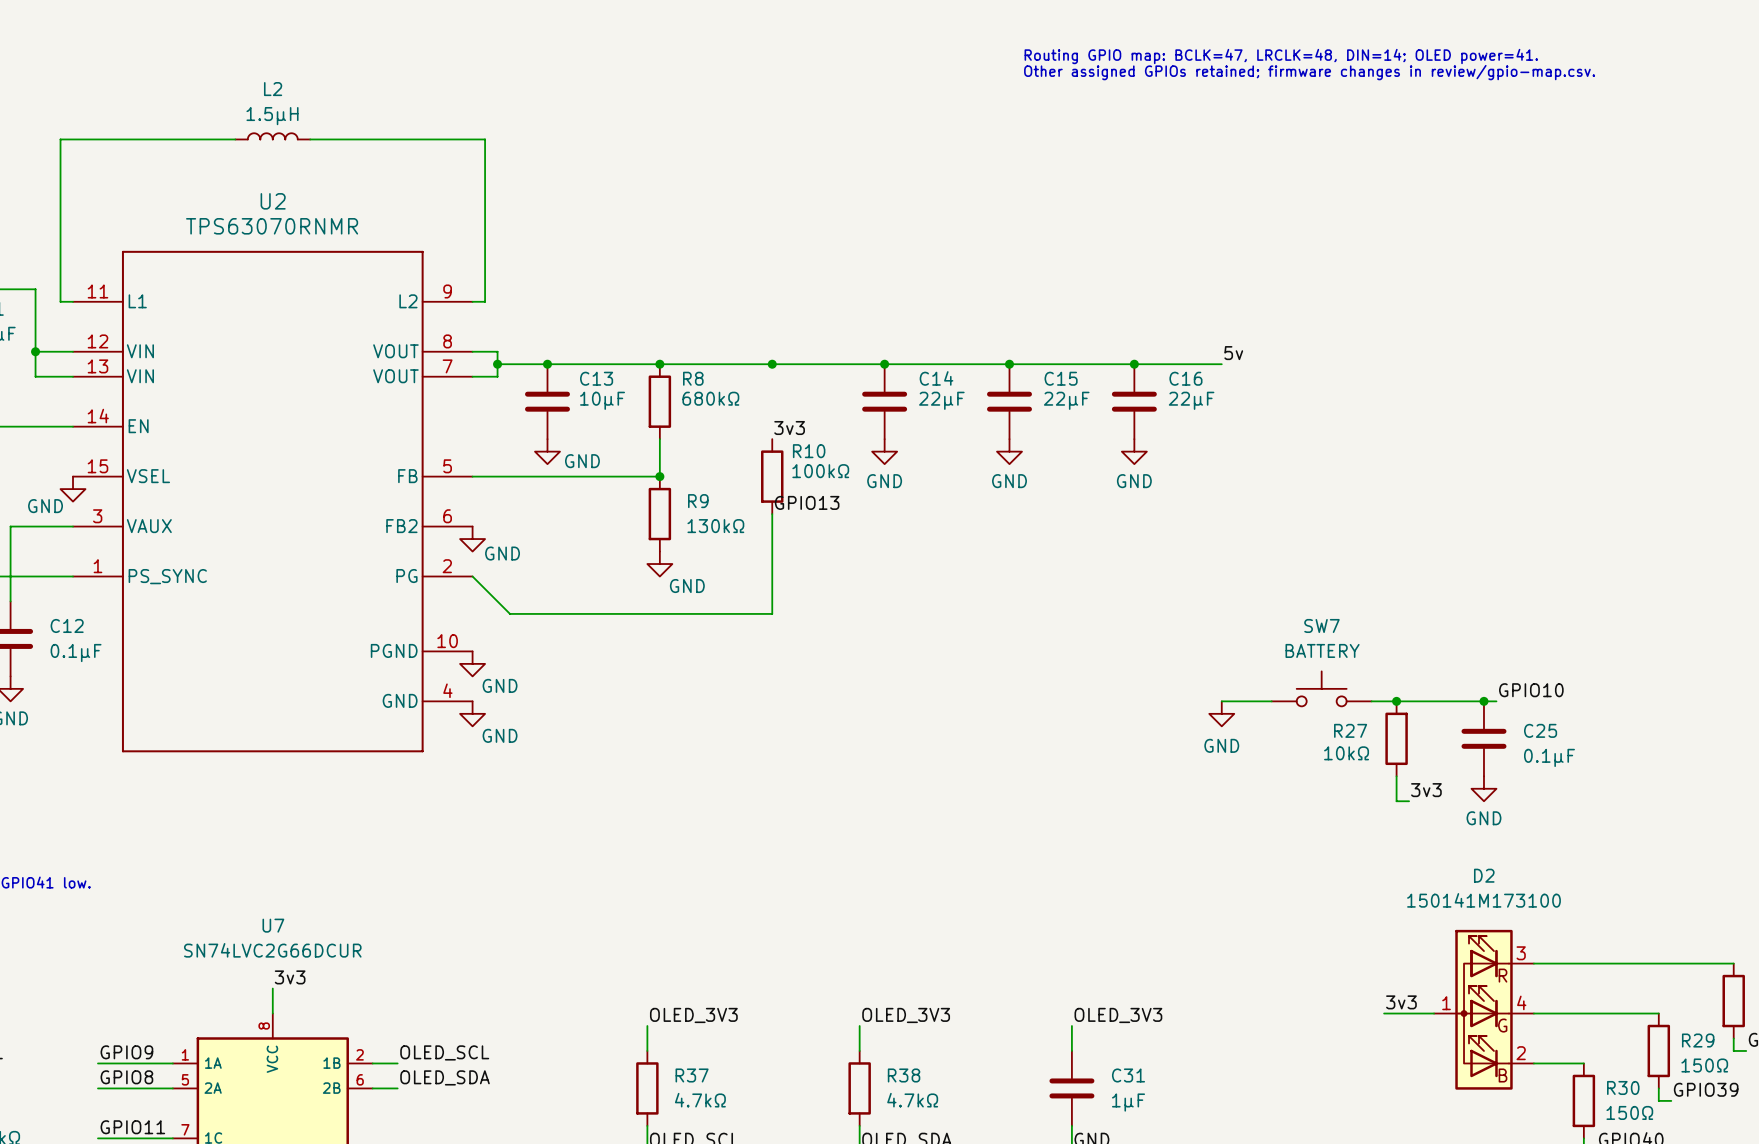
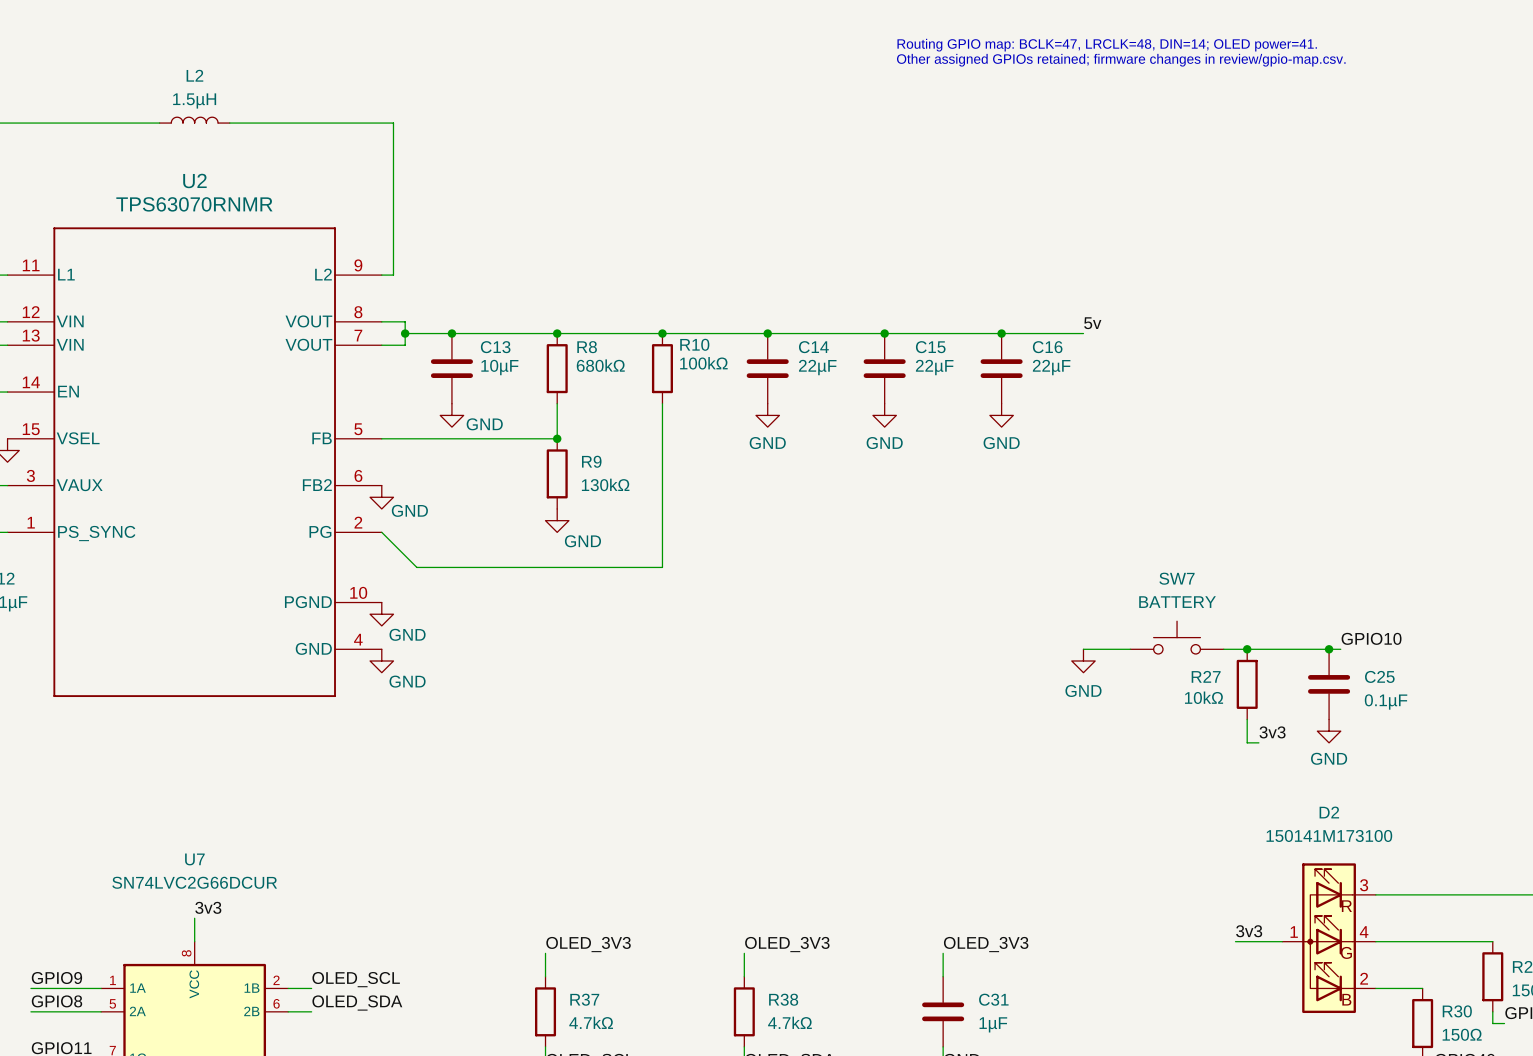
label: 3v3 (789, 428) -> none
wire: none -> (662, 403) (662, 473)
R10 position: (772, 476) -> (662, 368)
label: GPIO13 (807, 502) -> none

